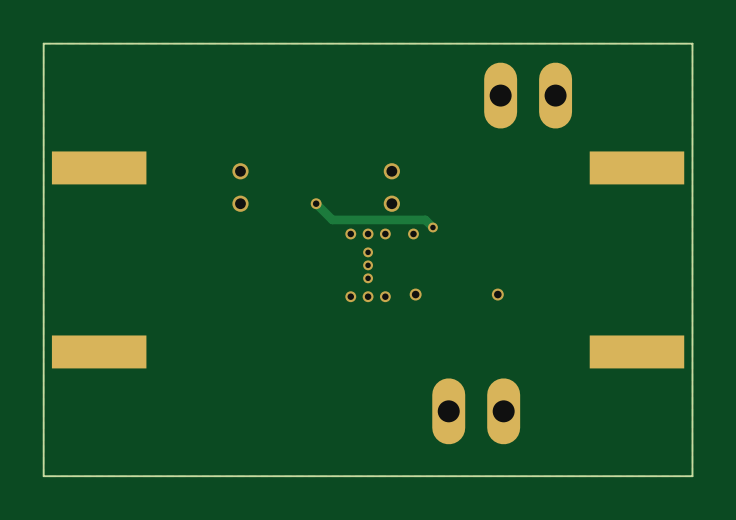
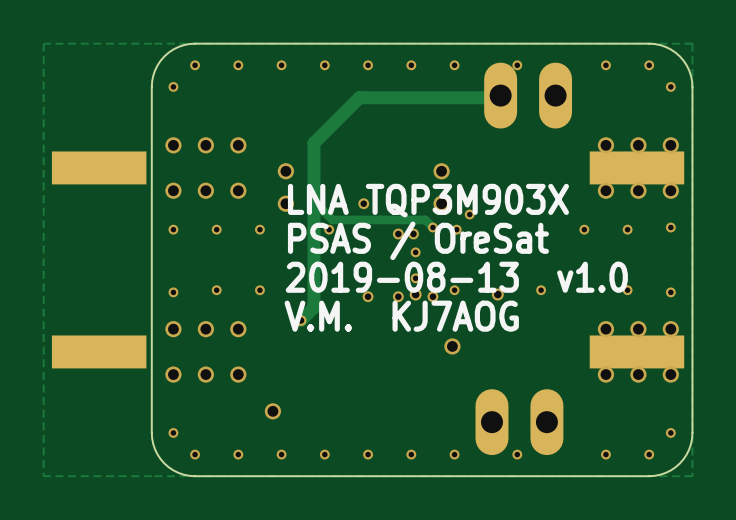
board edge: (195, 43) (43, 43) (43, 476) (195, 476) -> (195, 43) (178, 46) (164, 56) (155, 70) (151, 86) (152, 438) (157, 454) (168, 467) (178, 472) (195, 476)
board edge: (649, 43) (692, 43) (692, 86) -> (649, 43) (665, 46) (679, 56) (689, 70) (692, 86)
via: none -> (195, 65)
via: none -> (238, 65)
via: none -> (281, 65)
via: none -> (324, 65)
via: none -> (368, 65)
via: none -> (411, 65)
via: none -> (454, 65)
via: none -> (517, 65)
via: none -> (605, 65)
via: none -> (649, 65)
via: none -> (173, 86)
via: none -> (670, 86)
track: none -> (491, 97) (359, 97) (314, 143) (314, 307) (301, 320)
via: none -> (173, 145)
via: none -> (205, 145)
via: none -> (238, 145)
via: none -> (605, 145)
via: none -> (638, 145)
via: none -> (670, 145)
via: (240, 171) -> none
via: none -> (285, 171)
via: (391, 171) -> none
via: none -> (441, 171)
via: none -> (173, 190)
via: none -> (205, 190)
via: none -> (605, 190)
via: none -> (638, 190)
via: none -> (670, 190)
text: none -> LNA TQP3M903X (428, 200)
via position: (240, 203) -> (238, 190)
via: none -> (285, 203)
via: (316, 203) -> none
via: none -> (363, 203)
via: (391, 203) -> none
via: none -> (441, 203)
via: none -> (469, 214)
via: none -> (670, 227)
via: none -> (173, 229)
via: none -> (216, 229)
via: none -> (259, 229)
via: none -> (329, 229)
via: none -> (456, 229)
via: none -> (584, 229)
via: none -> (627, 229)
via: (350, 233) -> none
via: (368, 233) -> none
via position: (385, 233) -> (398, 233)
text: none -> PSAS / OreSat (418, 240)
via: (368, 252) -> none
via: none -> (415, 252)
via: (368, 265) -> none
text: none -> 2019-08-13 v1.0 (456, 277)
via: (368, 278) -> none
via: none -> (415, 278)
via: none -> (216, 290)
via: none -> (259, 290)
via: none -> (454, 290)
via: none -> (541, 290)
via: none -> (627, 290)
via: none -> (173, 292)
via: none -> (670, 292)
via: (350, 296) -> none
via position: (385, 296) -> (398, 296)
via: none -> (432, 296)
text: none -> V.M. KJ7AOG (401, 316)
via: none -> (301, 320)
via: none -> (173, 329)
via: none -> (205, 329)
via: none -> (238, 329)
via: none -> (605, 329)
via: none -> (638, 329)
via: none -> (670, 329)
via: none -> (452, 346)
via: none -> (173, 374)
via: none -> (205, 374)
via: none -> (238, 374)
via: none -> (605, 374)
via: none -> (638, 374)
via: none -> (670, 374)
via: none -> (272, 411)
part position: (476, 411) -> (519, 422)
via: none -> (173, 432)
via: none -> (670, 432)
board edge: (692, 432) (692, 476) (649, 476) -> (692, 432) (689, 449) (679, 463) (665, 472) (649, 476)
via: none -> (195, 454)
via: none -> (238, 454)
via: none -> (281, 454)
via: none -> (324, 454)
via: none -> (368, 454)
via: none -> (411, 454)
via: none -> (454, 454)
via: none -> (517, 454)
via: none -> (605, 454)
via: none -> (649, 454)

